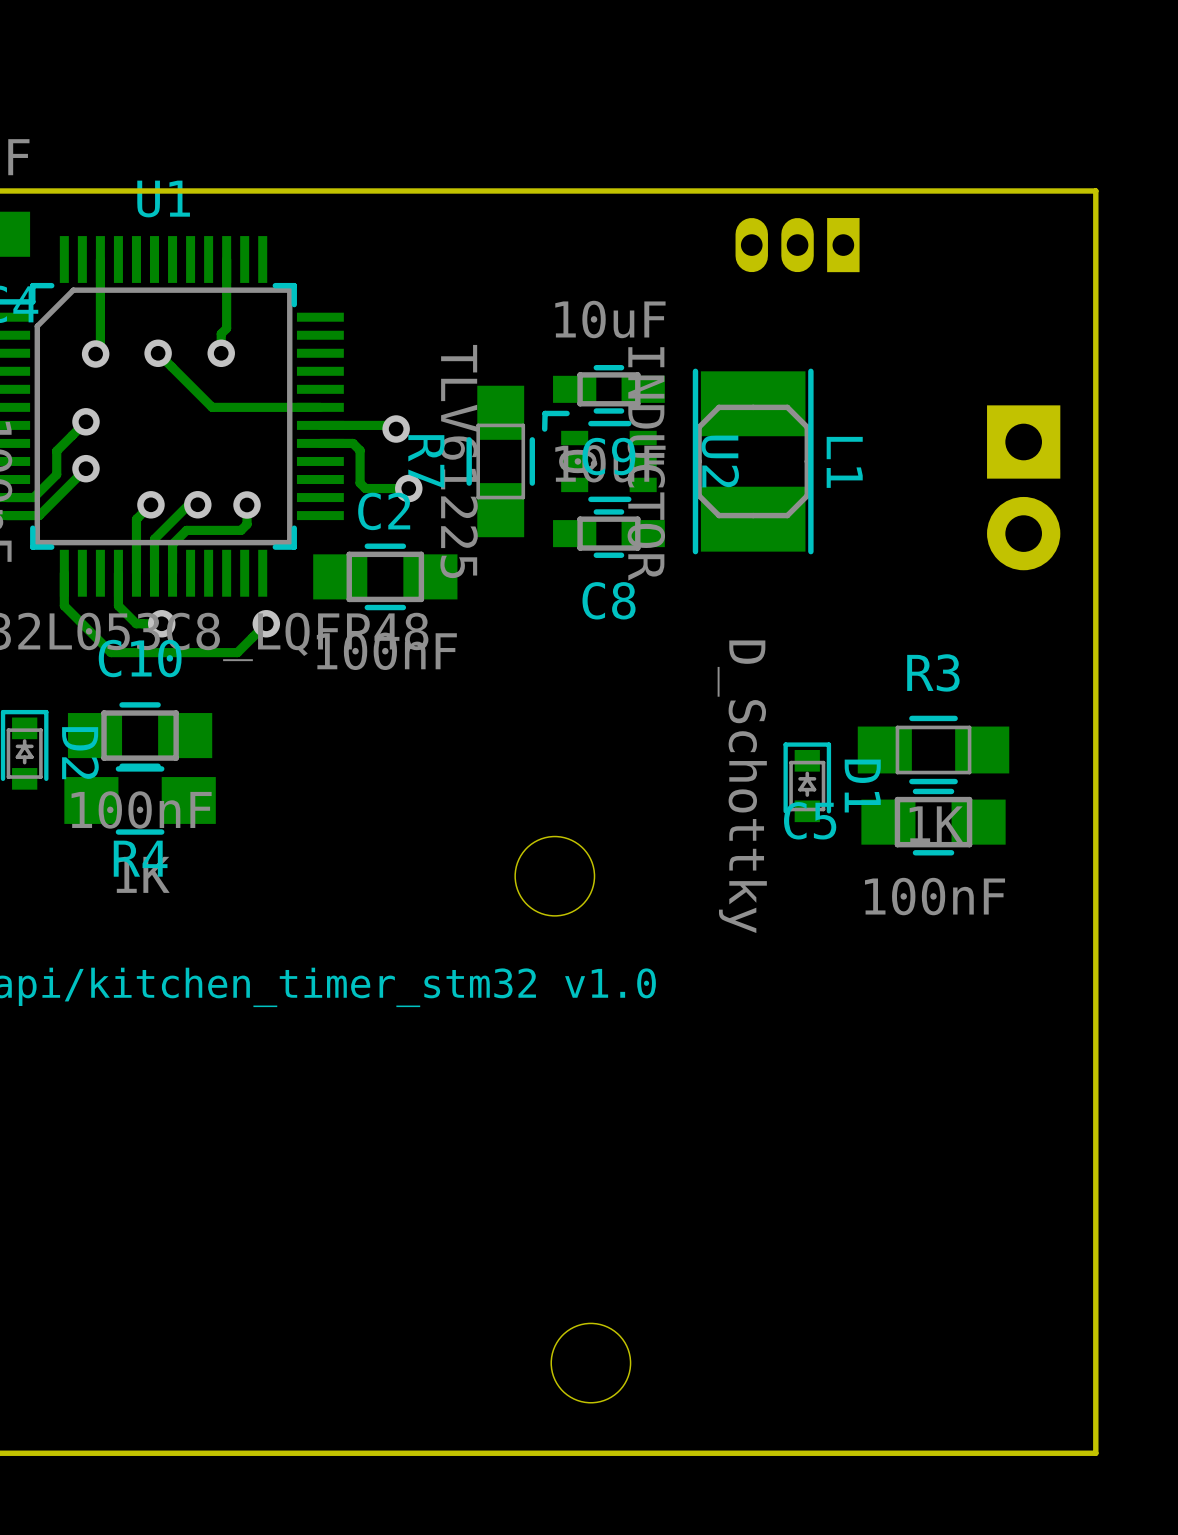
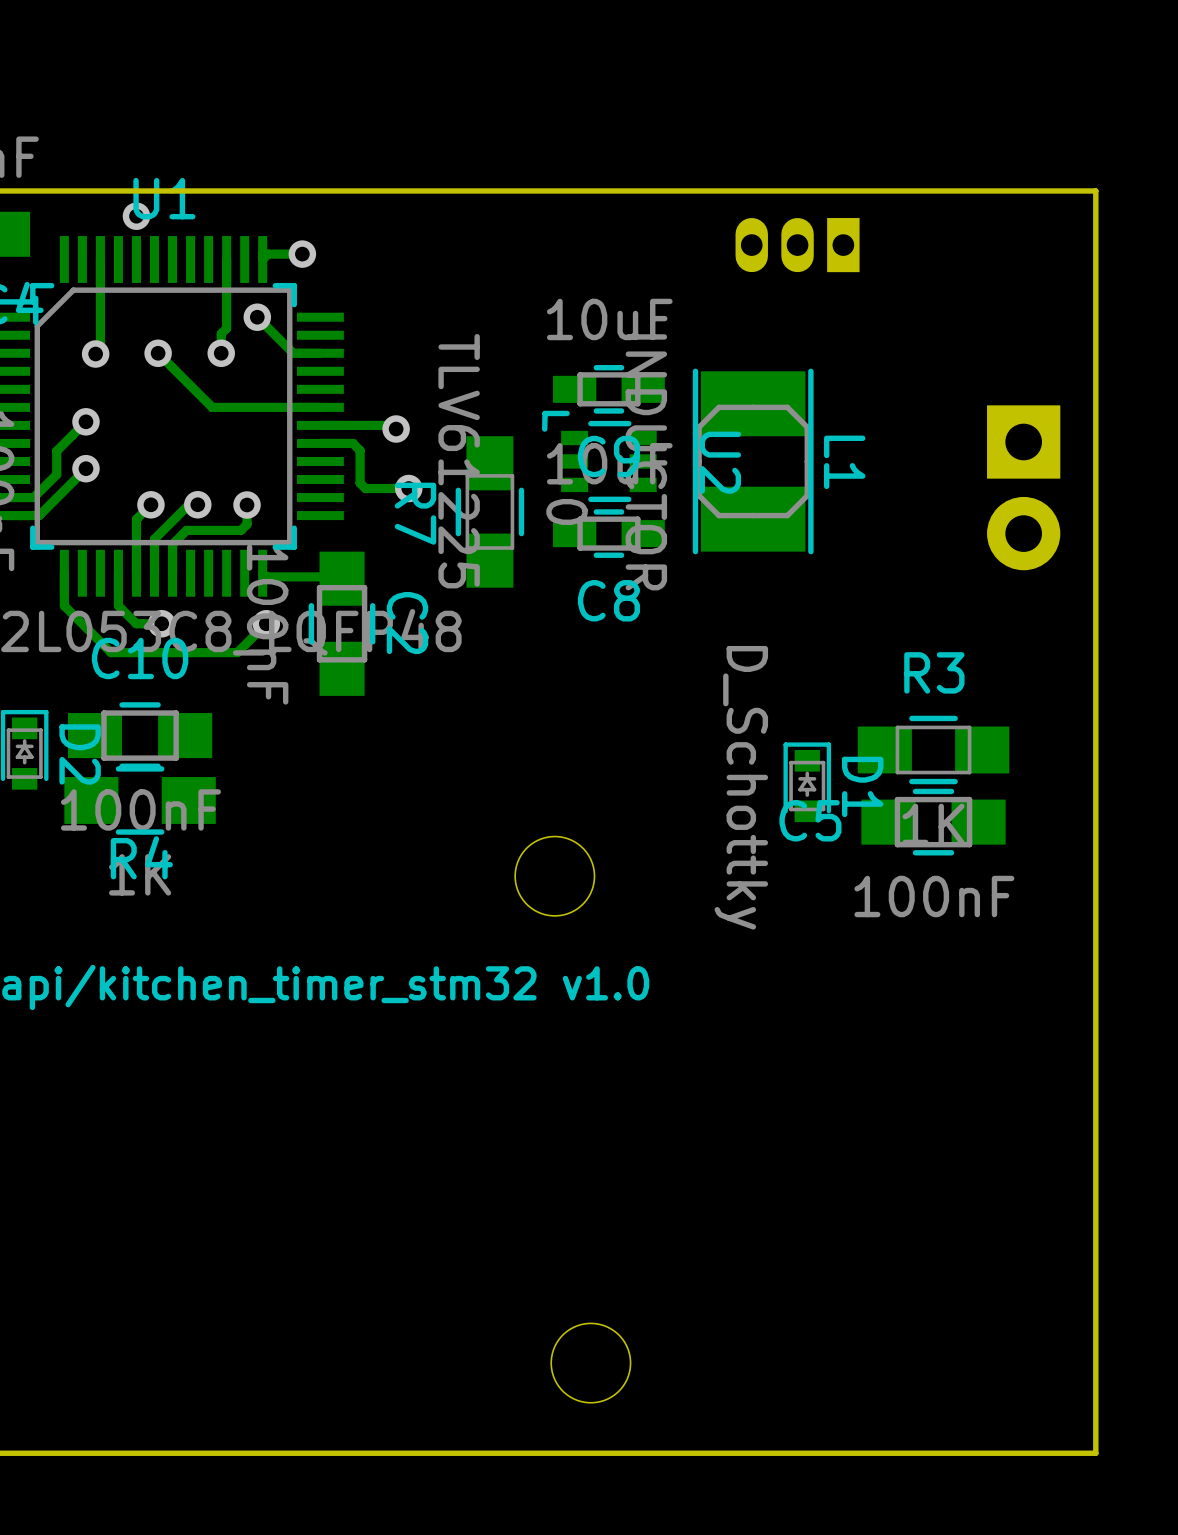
via: none -> (136, 216)
track: none -> (262, 252) (262, 259) (268, 254) (302, 254)
via: none -> (302, 254)
track: none -> (257, 317) (293, 353) (320, 353)
via: none -> (257, 317)
R7 position: (500, 461) -> (489, 511)
track: none -> (262, 573) (266, 576) (340, 576)
C2 rotation: 0° (385, 576) -> 90° clockwise (342, 623)

